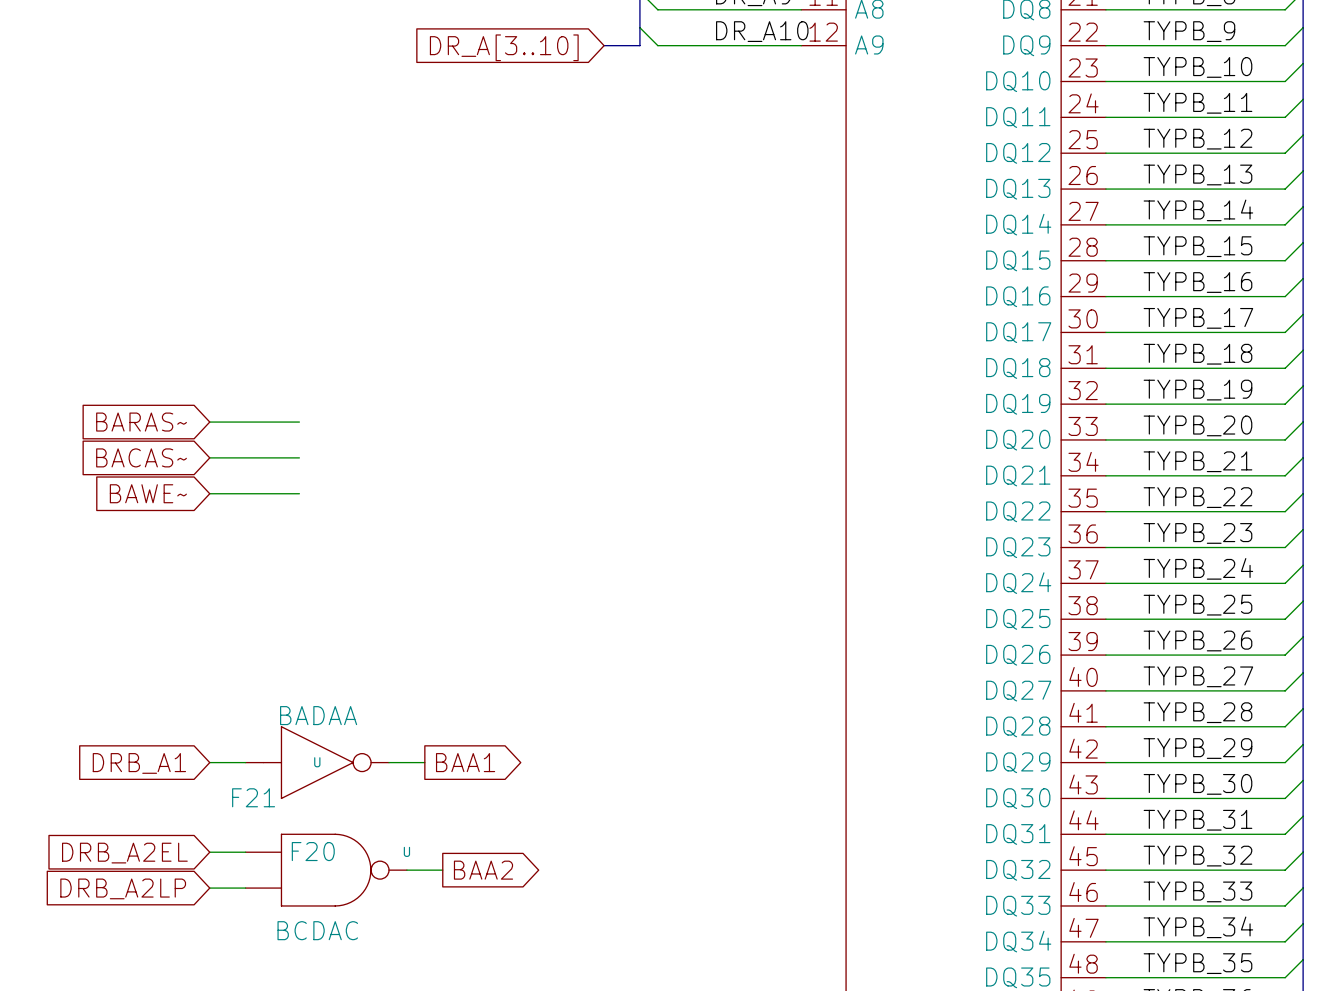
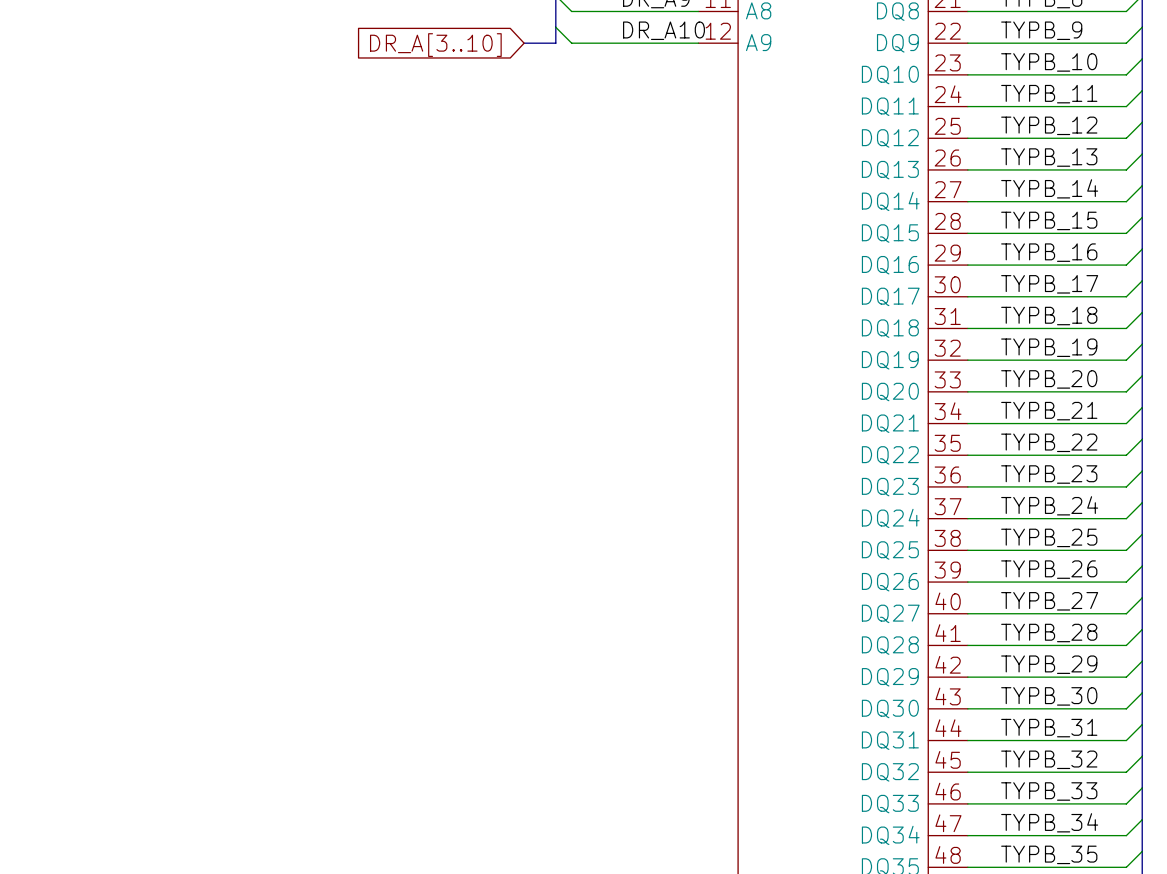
global label: BARAS~ (141, 422) -> none
wire: (209, 422) (299, 422) -> none
global label: BACAS~ (141, 457) -> none
wire: (209, 457) (299, 457) -> none
global label: BAWE~ (148, 493) -> none
wire: (209, 493) (299, 493) -> none
wire: (209, 762) (245, 762) -> none
U: (317, 762) -> none
wire: (389, 762) (424, 762) -> none
global label: BAA1 (465, 762) -> none
global label: DRB_A1 (139, 763) -> none
wire: (209, 852) (245, 852) -> none
global label: DRB_A2EL (124, 853) -> none
U: (326, 870) -> none
wire: (406, 870) (442, 870) -> none
global label: BAA2 (483, 870) -> none
global label: DRB_A2LP (123, 888) -> none
wire: (209, 888) (245, 888) -> none

